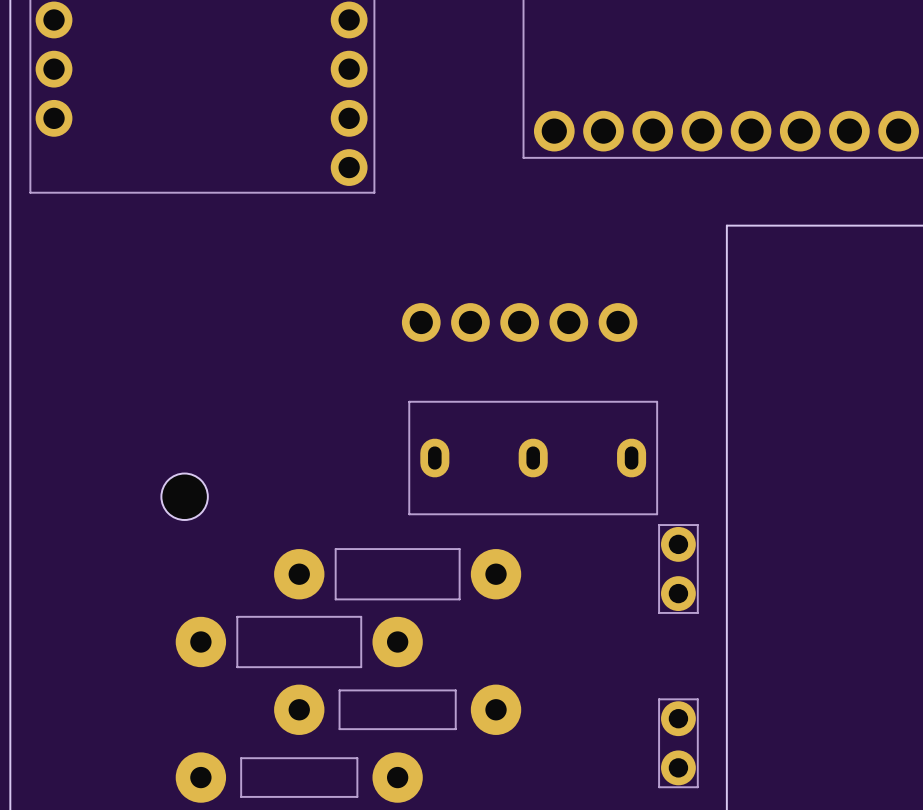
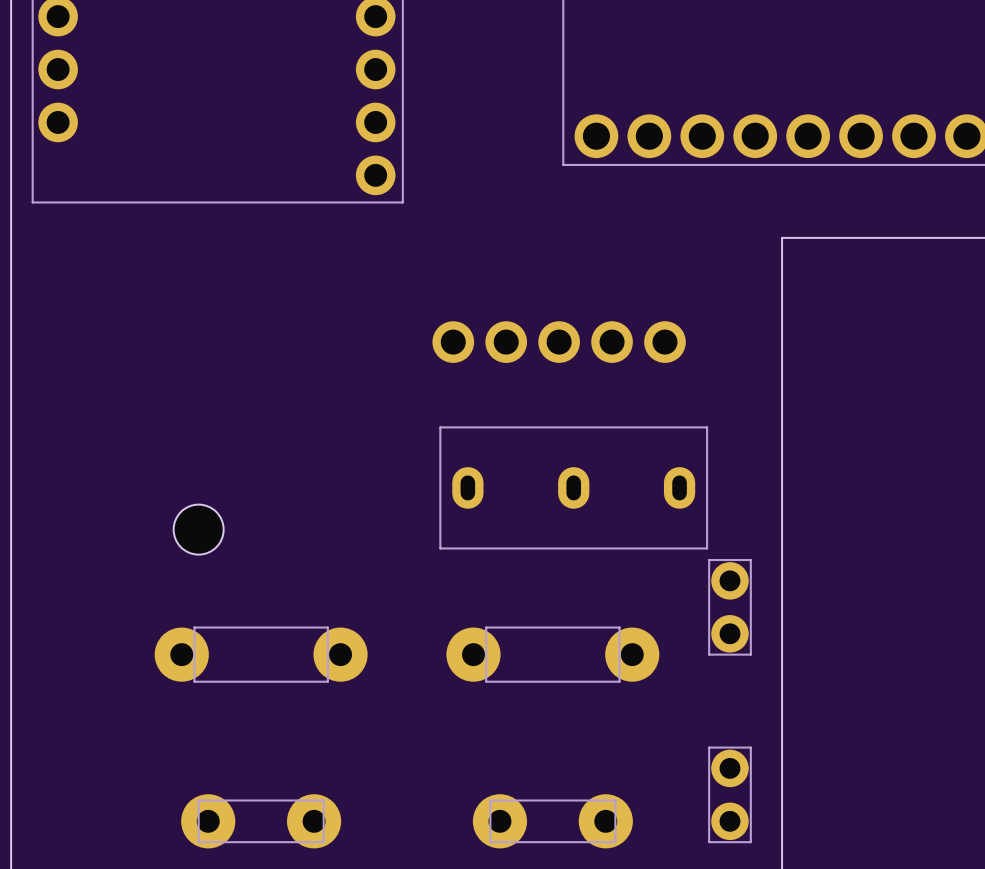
part: (397, 574) -> none
part: none -> (261, 654)
part: none -> (552, 654)
part: (299, 642) -> none
part: (397, 709) -> none
part: none -> (261, 821)
part: none -> (552, 821)
part: (299, 777) -> none

